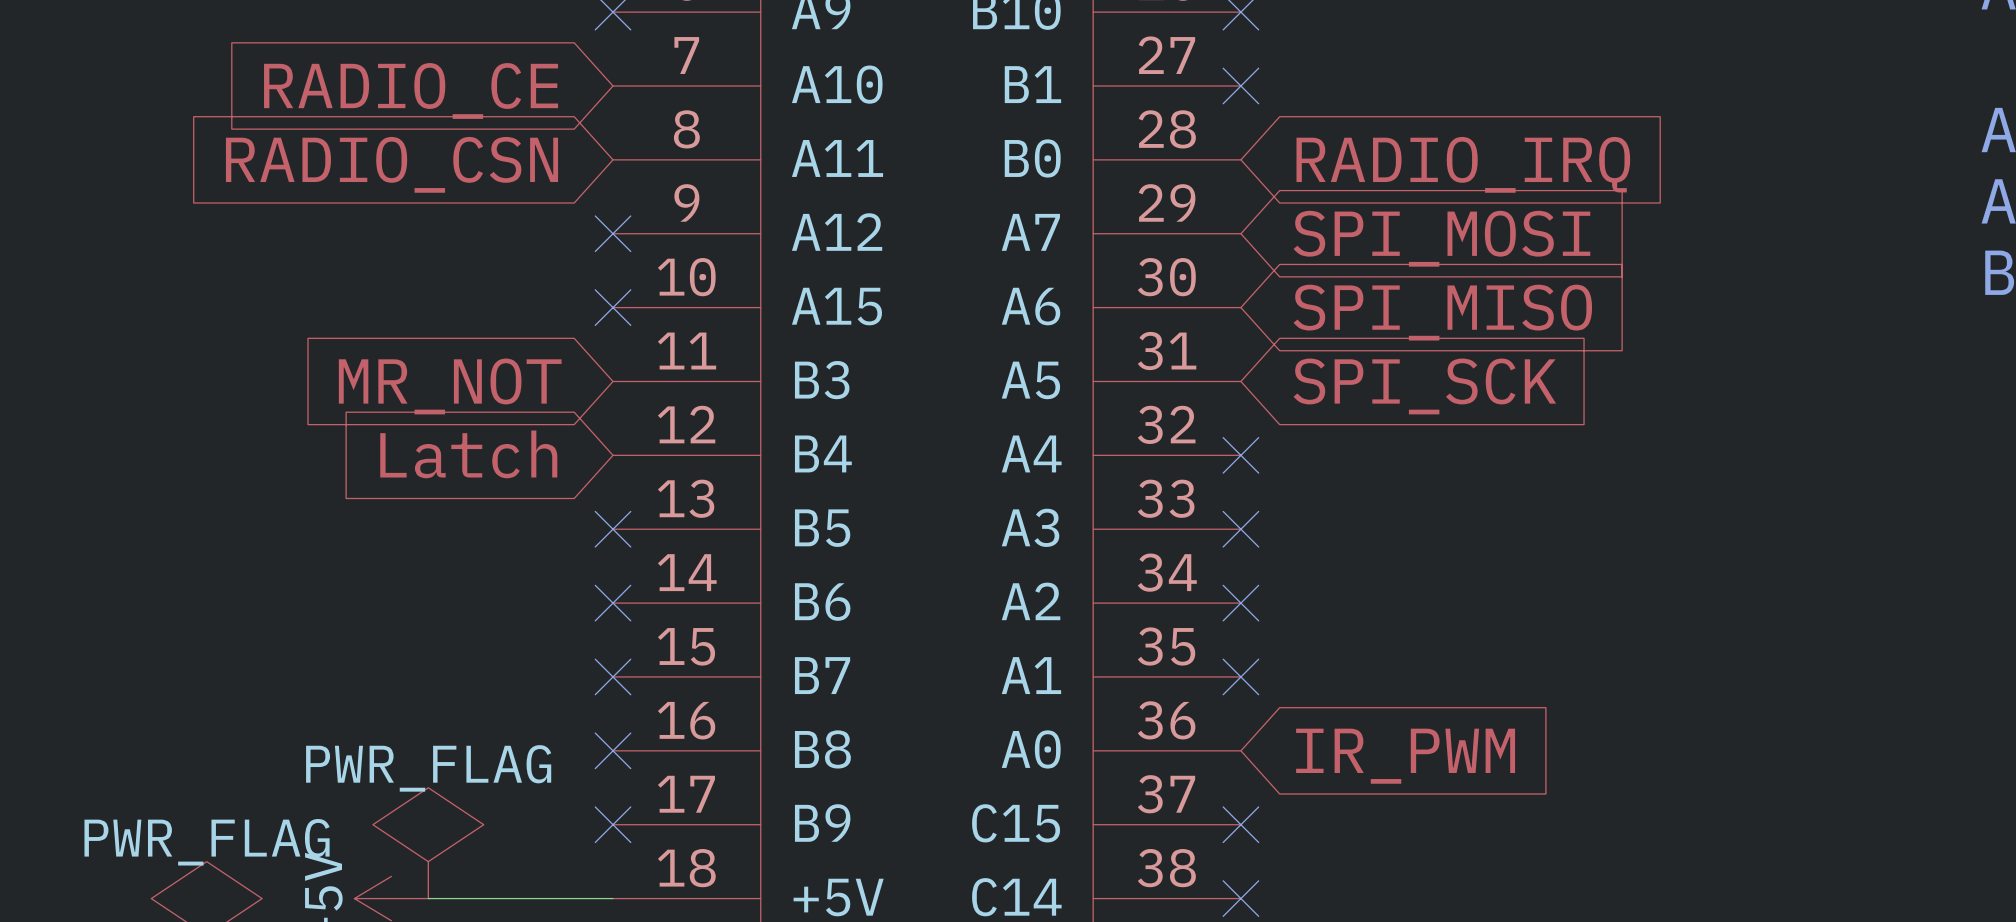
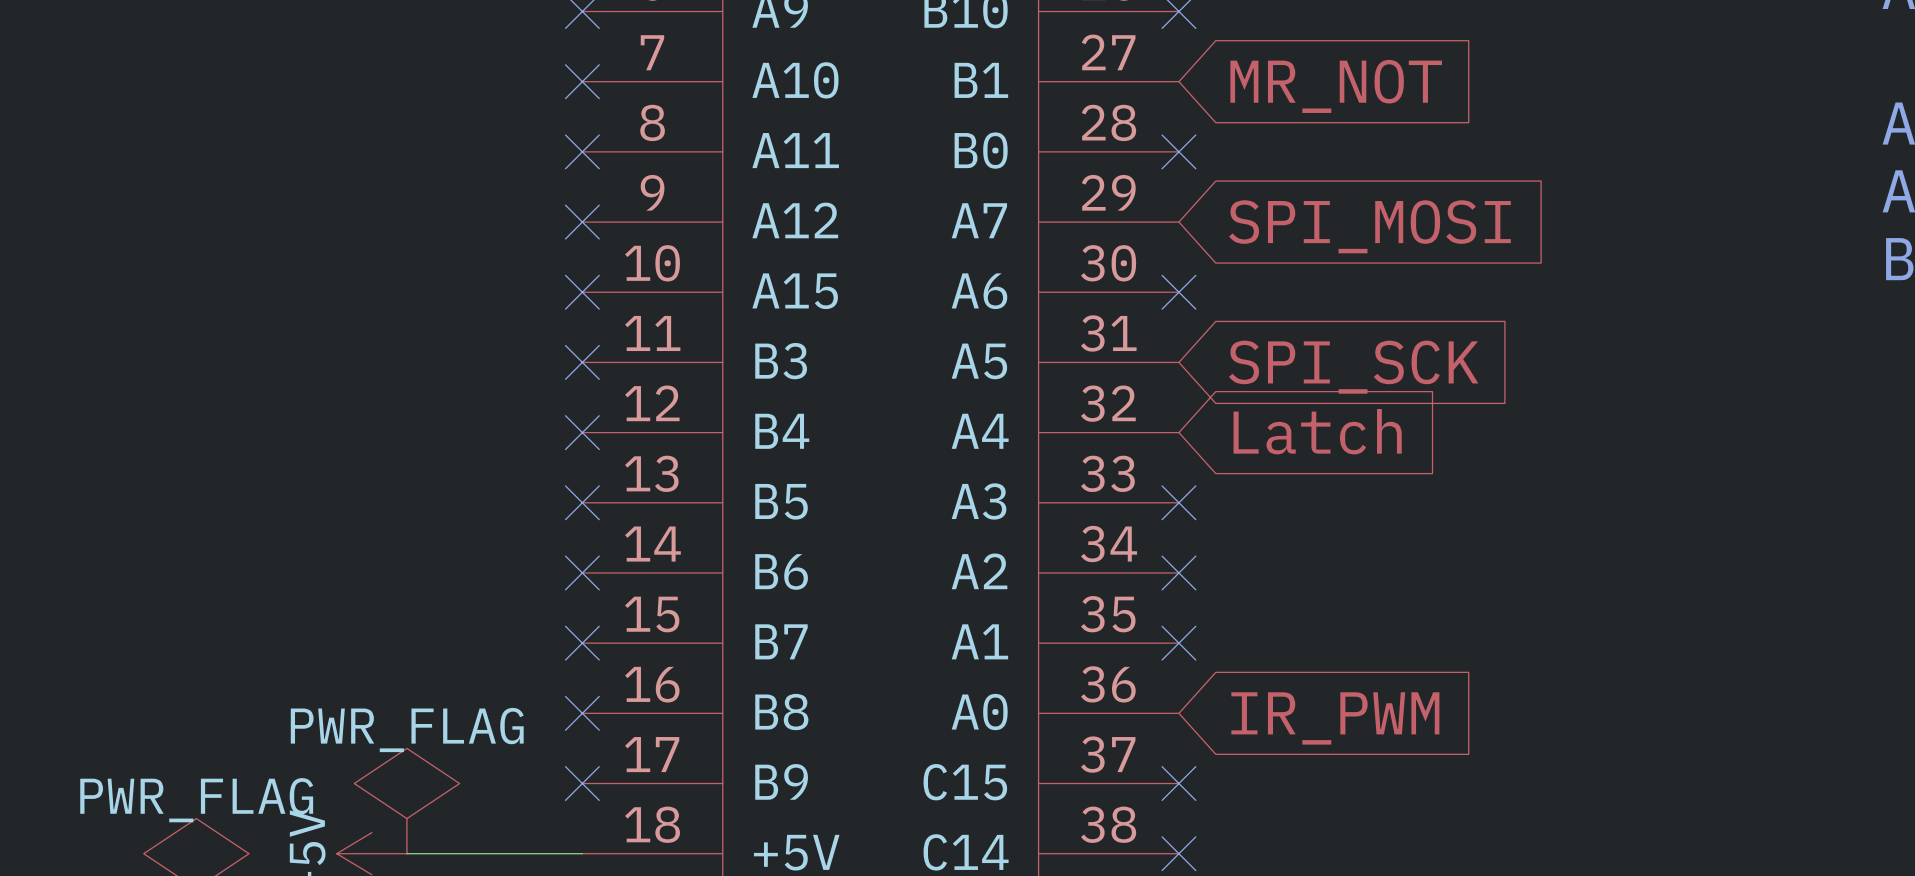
no-connect mark: none -> (582, 81)
no-connect mark position: (1240, 85) -> (1178, 151)
global label: RADIO_CE (411, 90) -> none
no-connect mark: none -> (582, 151)
global label: RADIO_CSN (392, 164) -> none
global label: RADIO_IRQ (1463, 164) -> none
no-connect mark: none -> (1178, 292)
global label: SPI_MISO (1442, 312) -> none
no-connect mark: none -> (582, 362)
global label rotation: 0° (450, 386) -> 180° (1336, 86)
global label position: MR_NOT (450, 386) -> MR_NOT (1336, 86)
global label rotation: 0° (468, 454) -> 180° (1317, 431)
global label position: Latch (468, 454) -> Latch (1317, 431)
no-connect mark: none -> (582, 432)
no-connect mark: (1240, 455) -> none

